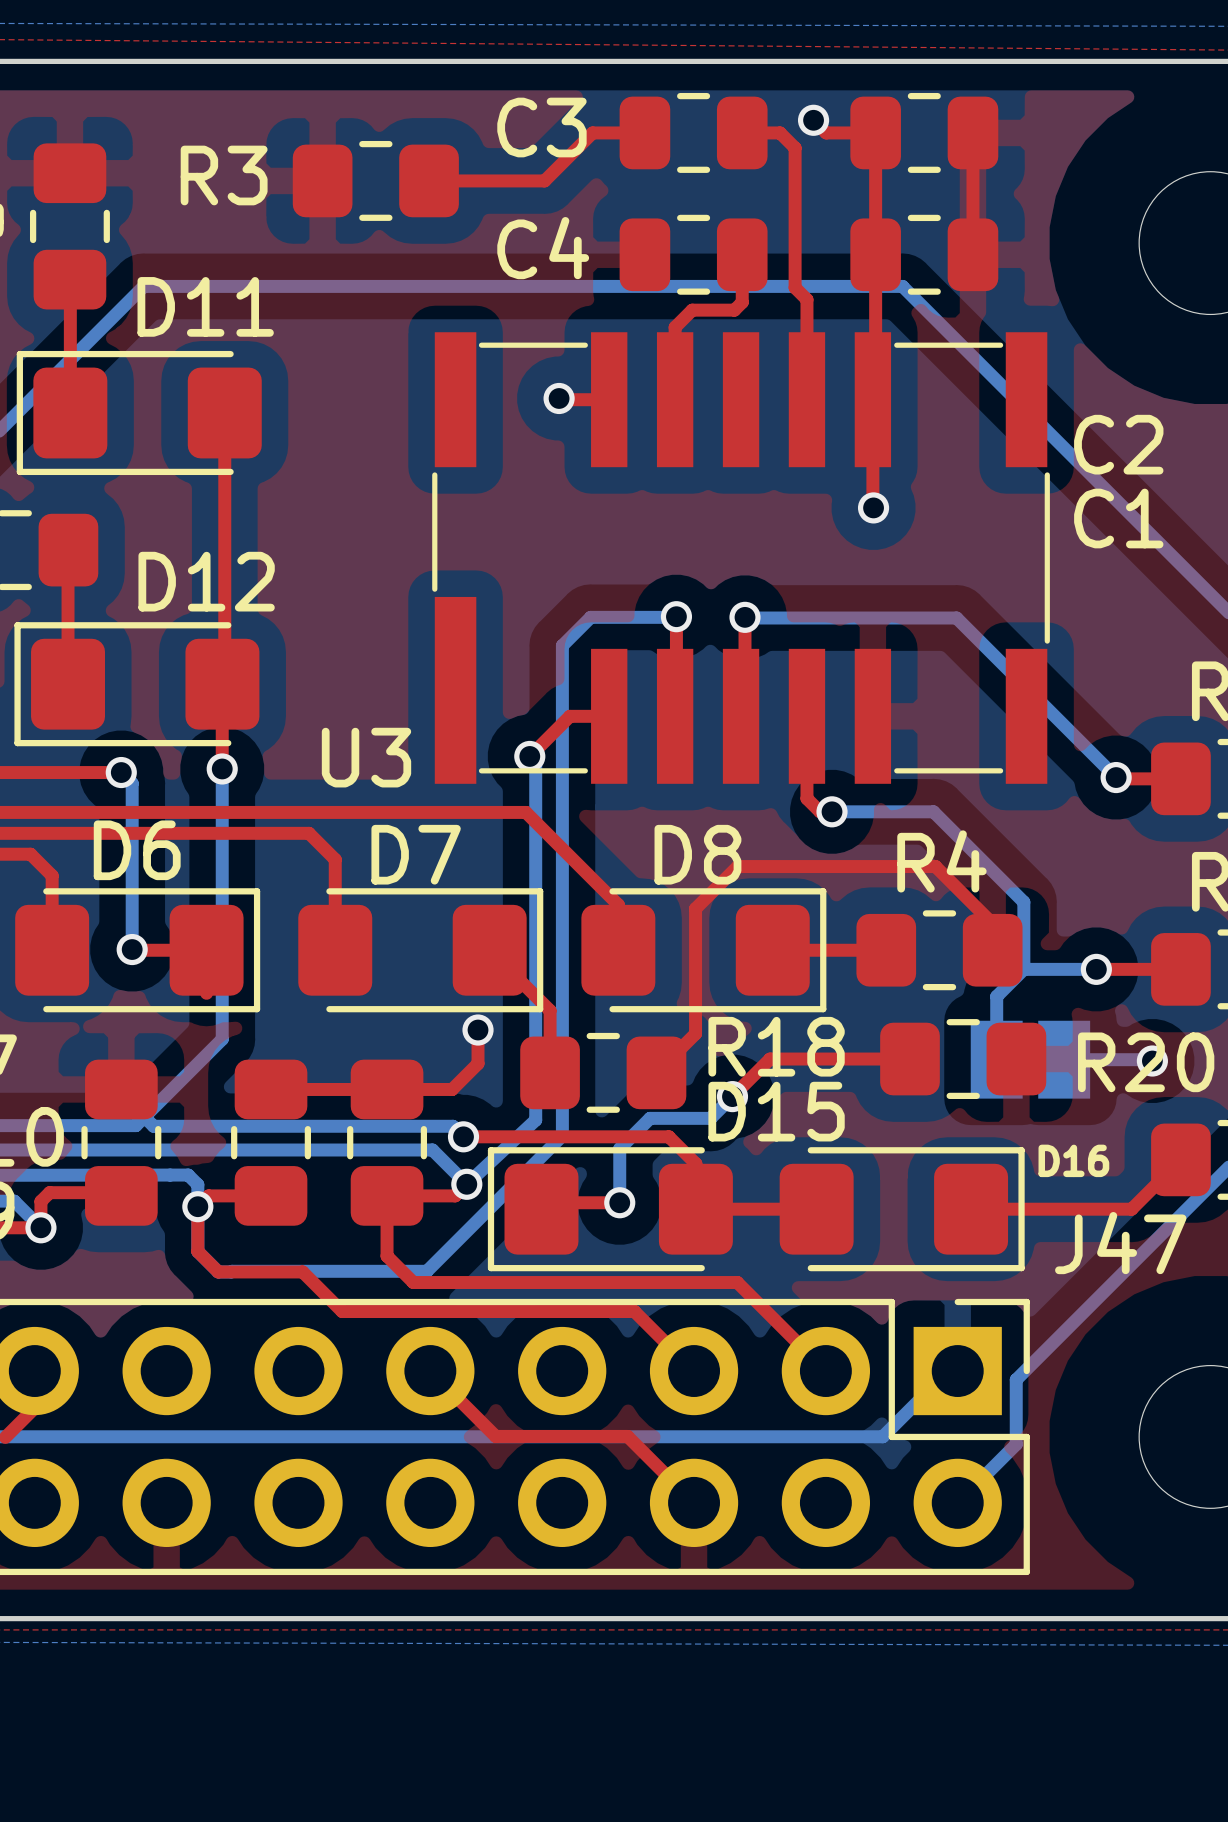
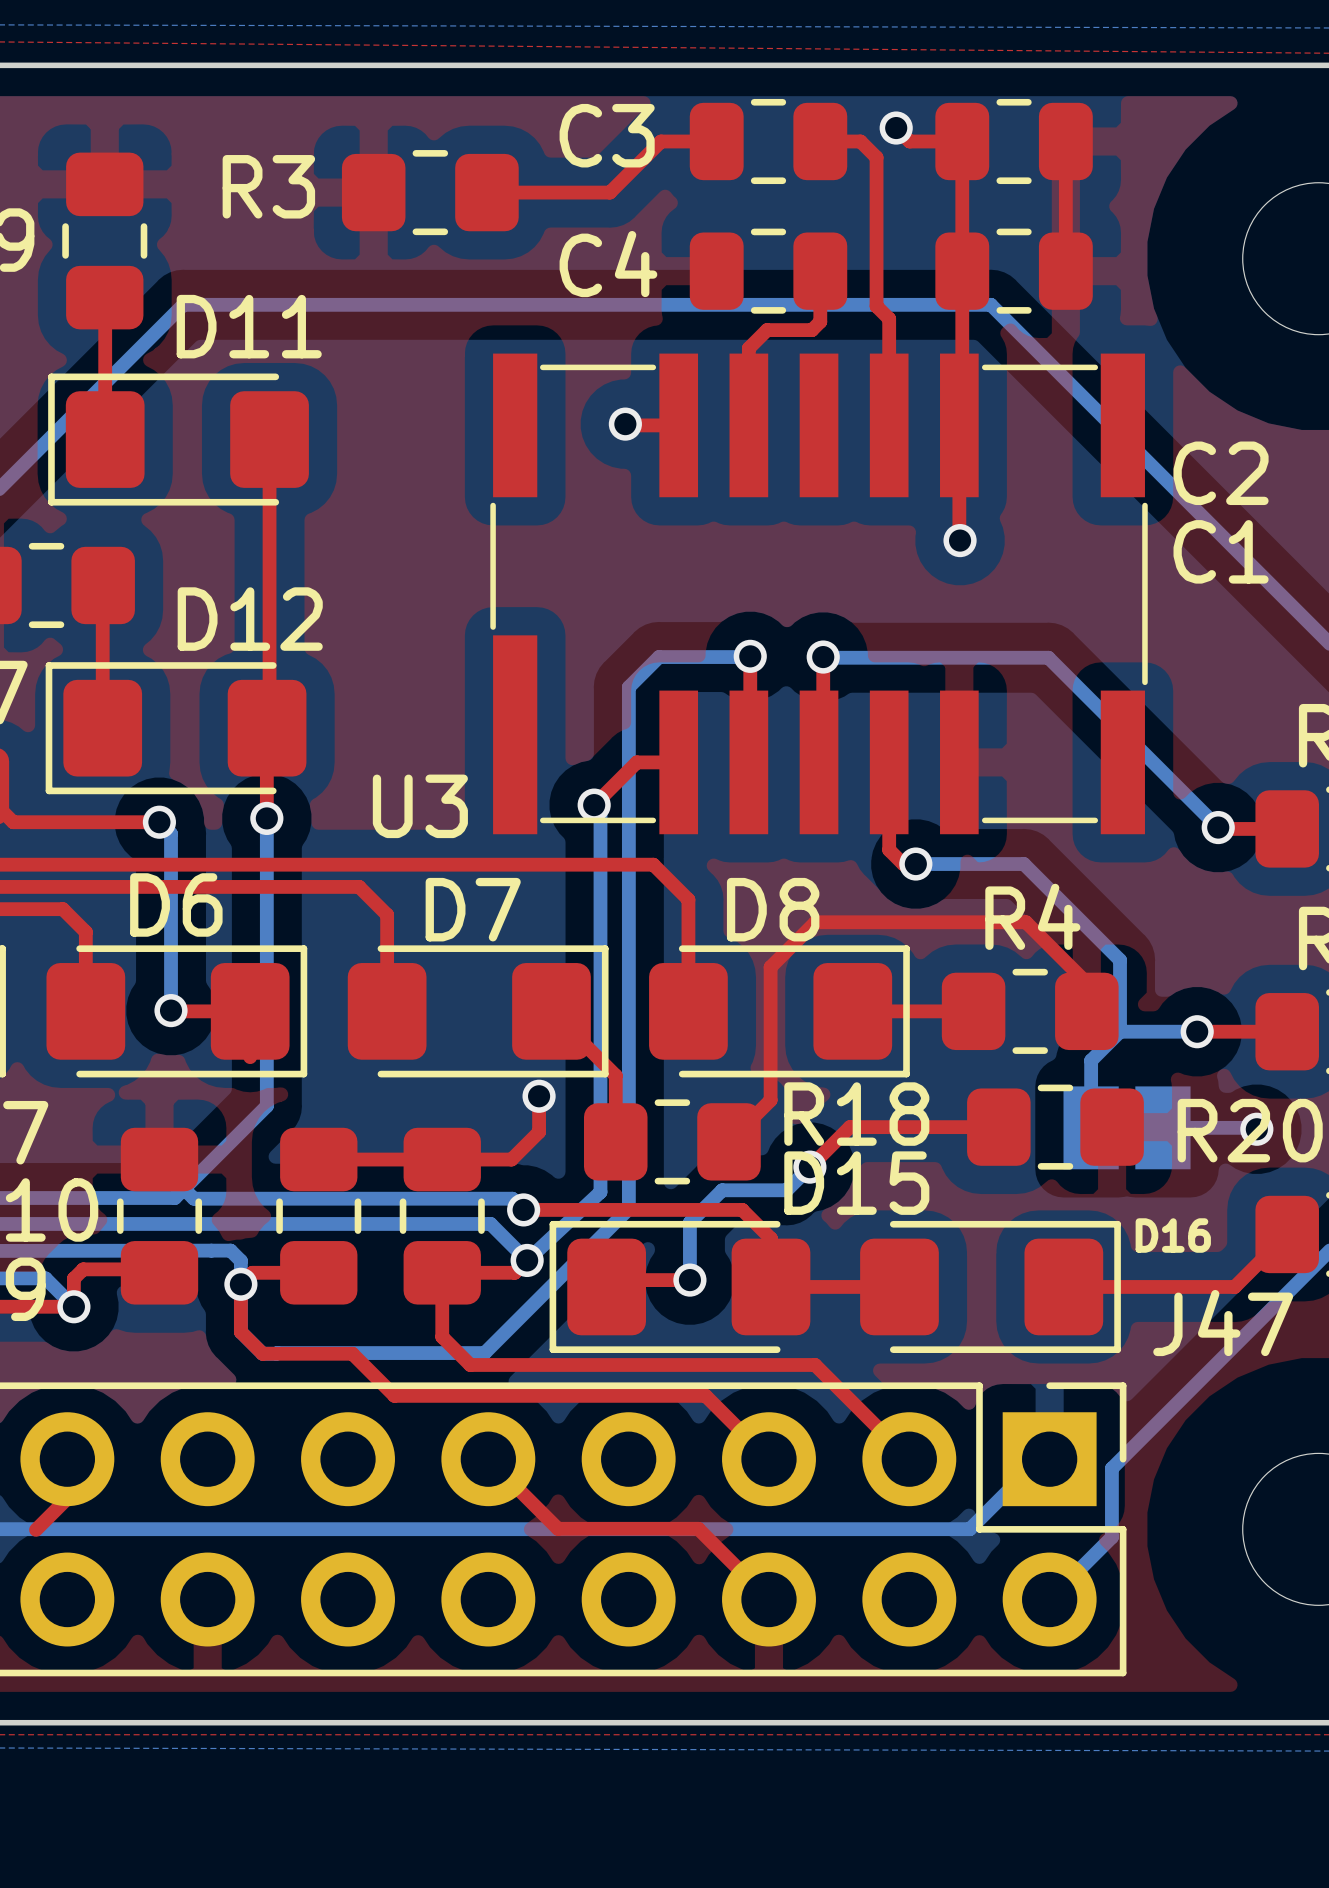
top track: (525, 812) (618, 904) -> (590, 864) (653, 864) (688, 899) (688, 963)

